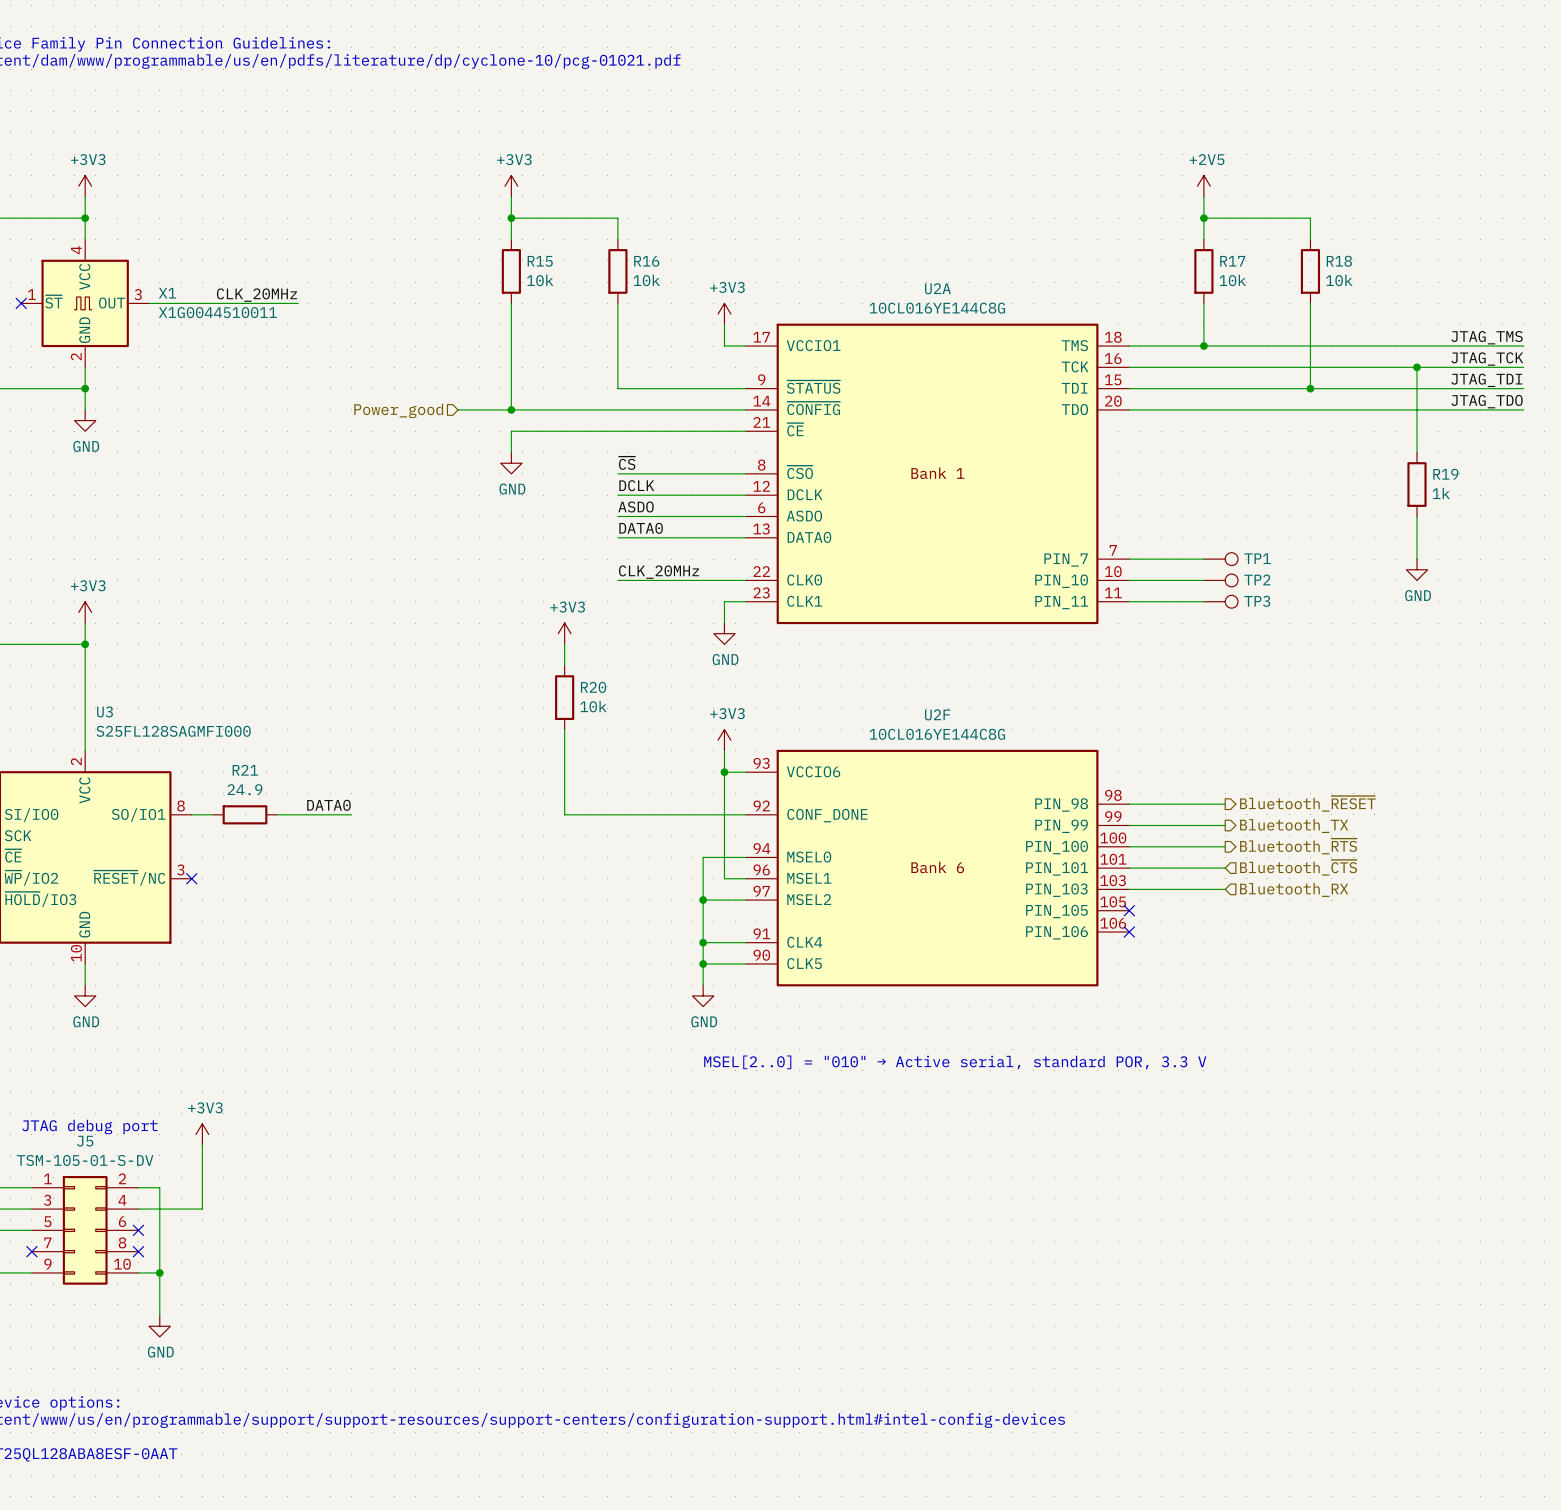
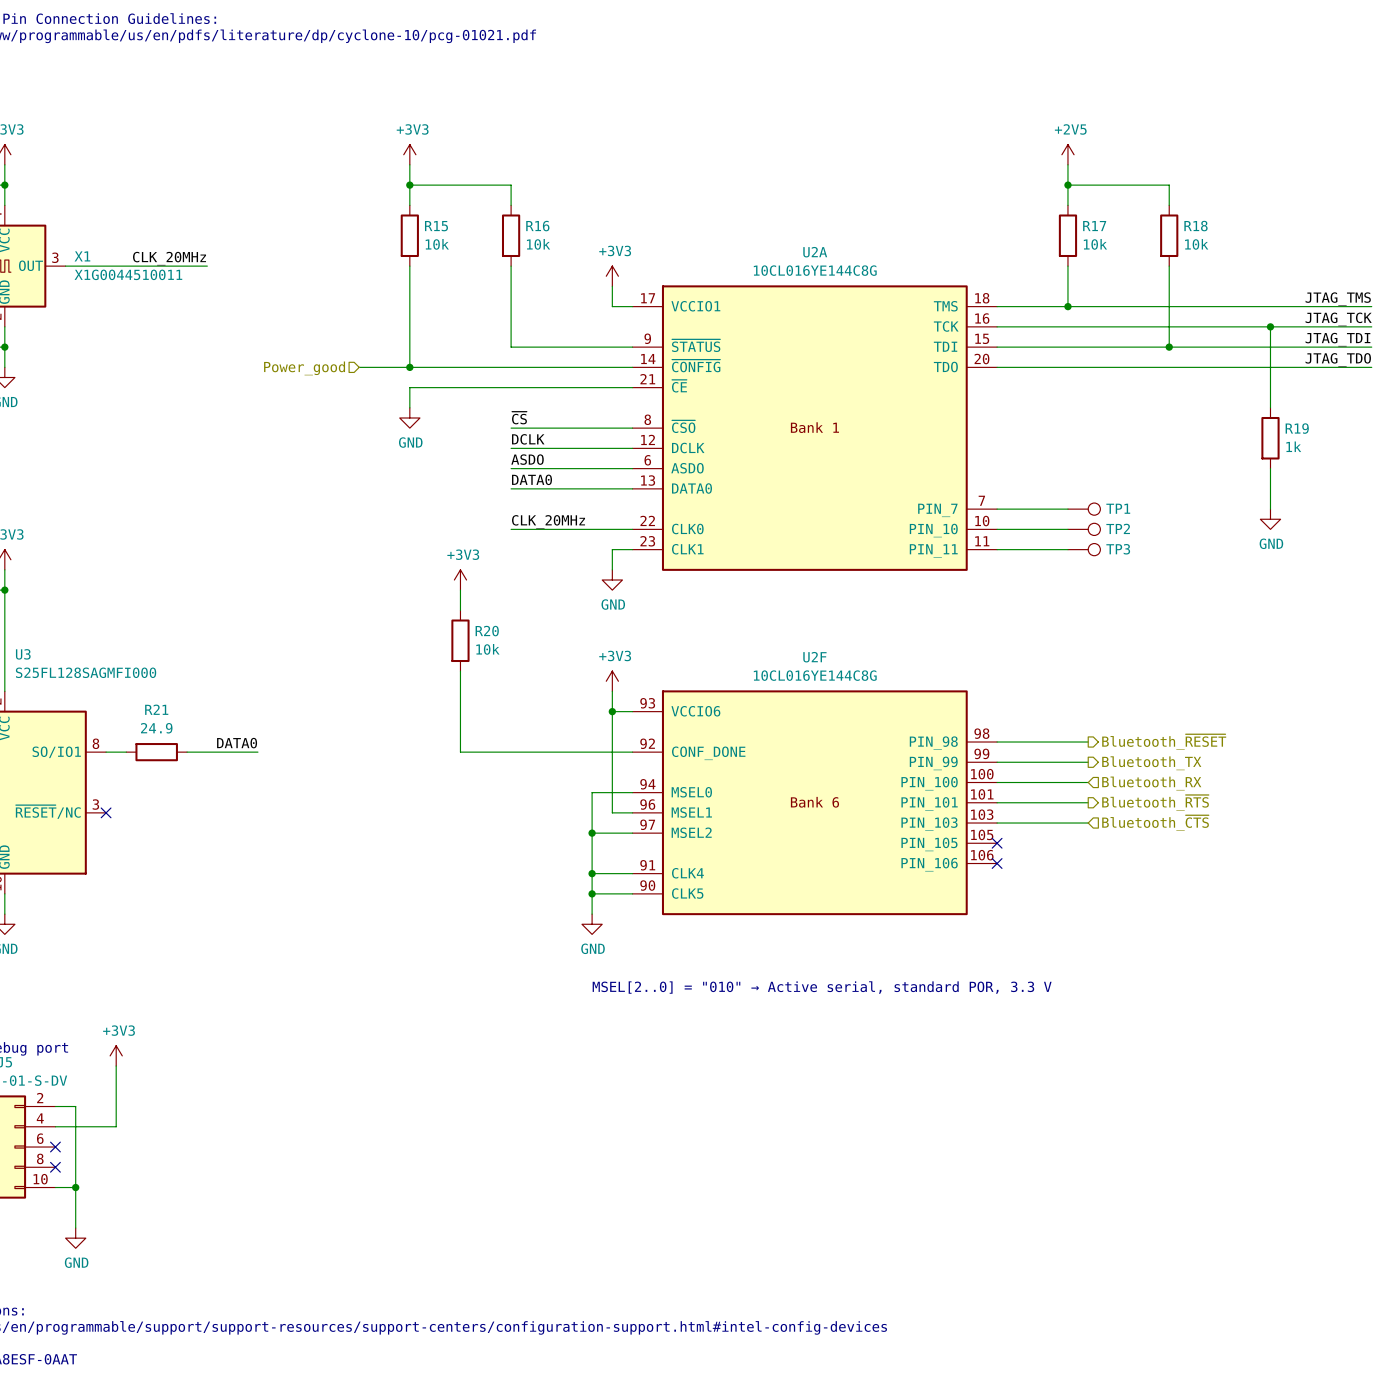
hierarchical label shape: output (1298, 846) -> input (1151, 783)
hierarchical label: Bluetooth_~{RTS} (1298, 846) -> Bluetooth_RX (1151, 783)
hierarchical label shape: input (1298, 867) -> output (1155, 802)
hierarchical label: Bluetooth_~{CTS} (1298, 867) -> Bluetooth_~{RTS} (1155, 802)
hierarchical label: Bluetooth_RX (1294, 889) -> Bluetooth_~{CTS} (1155, 823)

